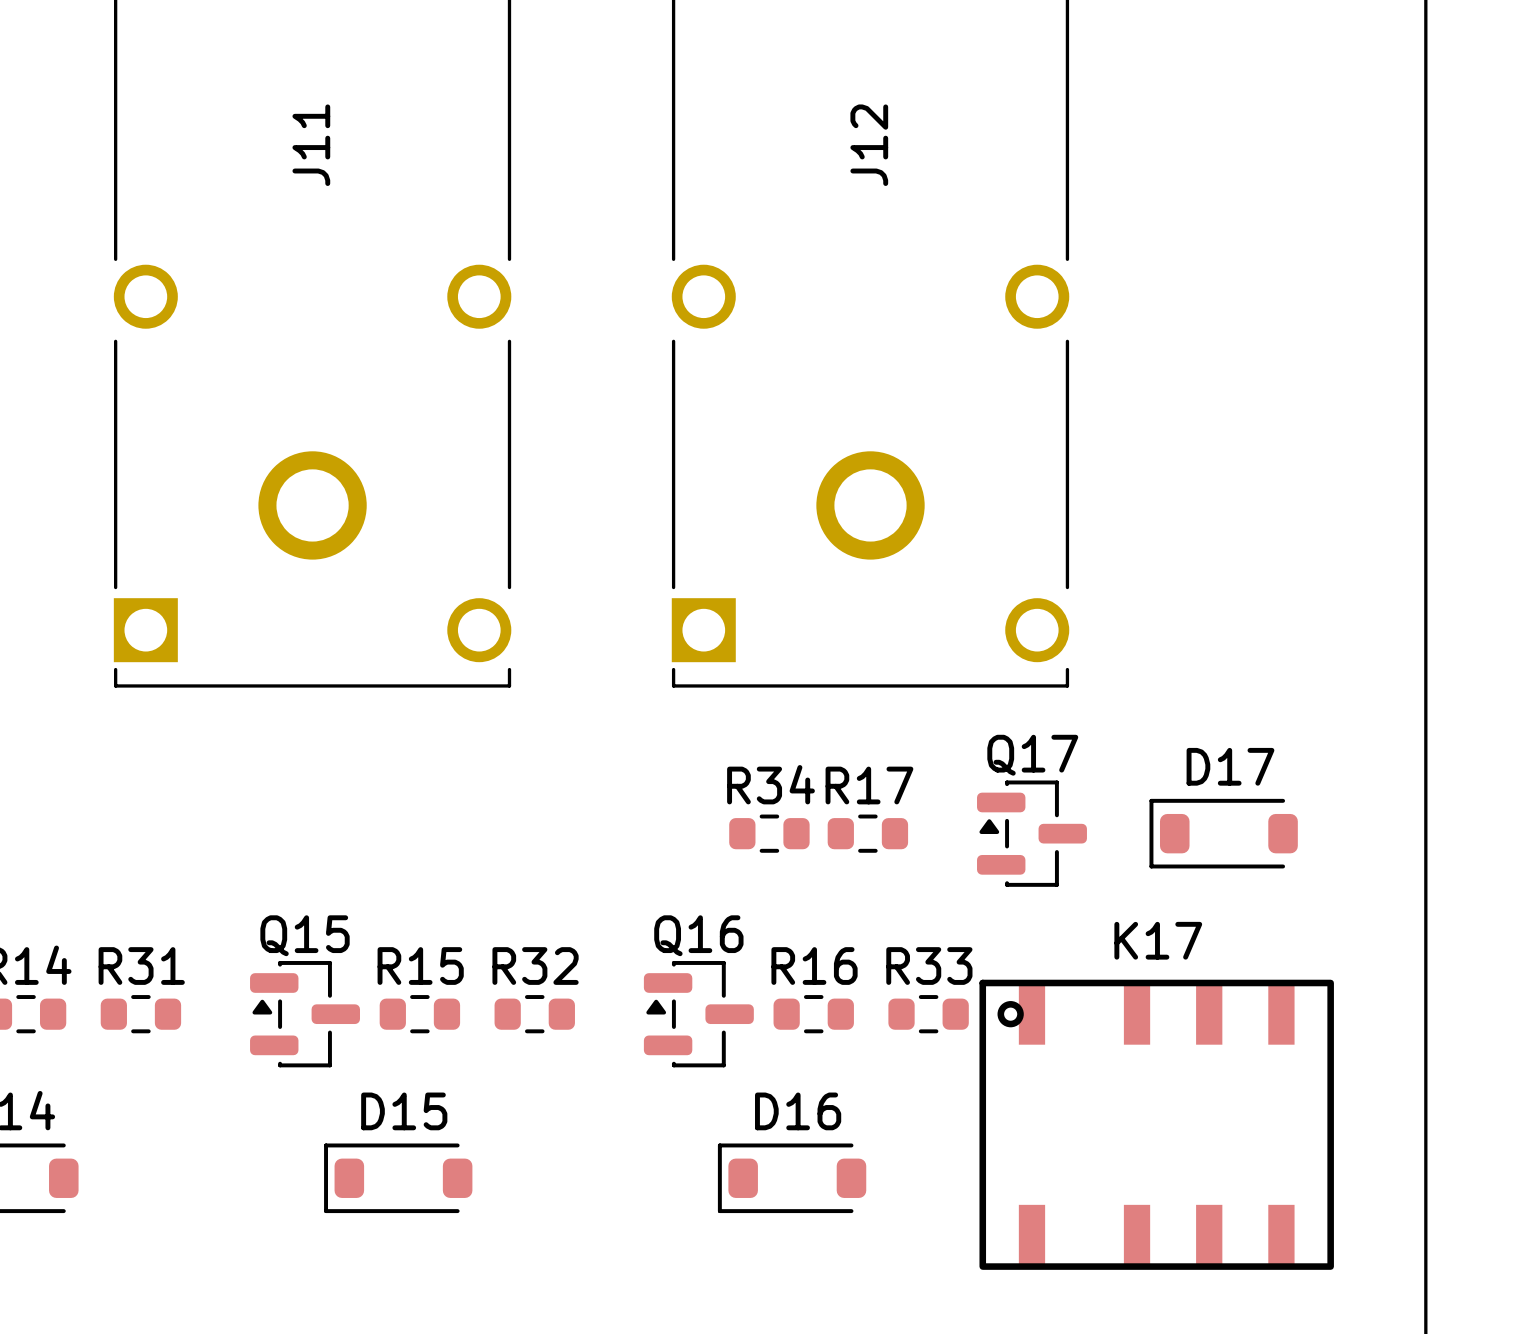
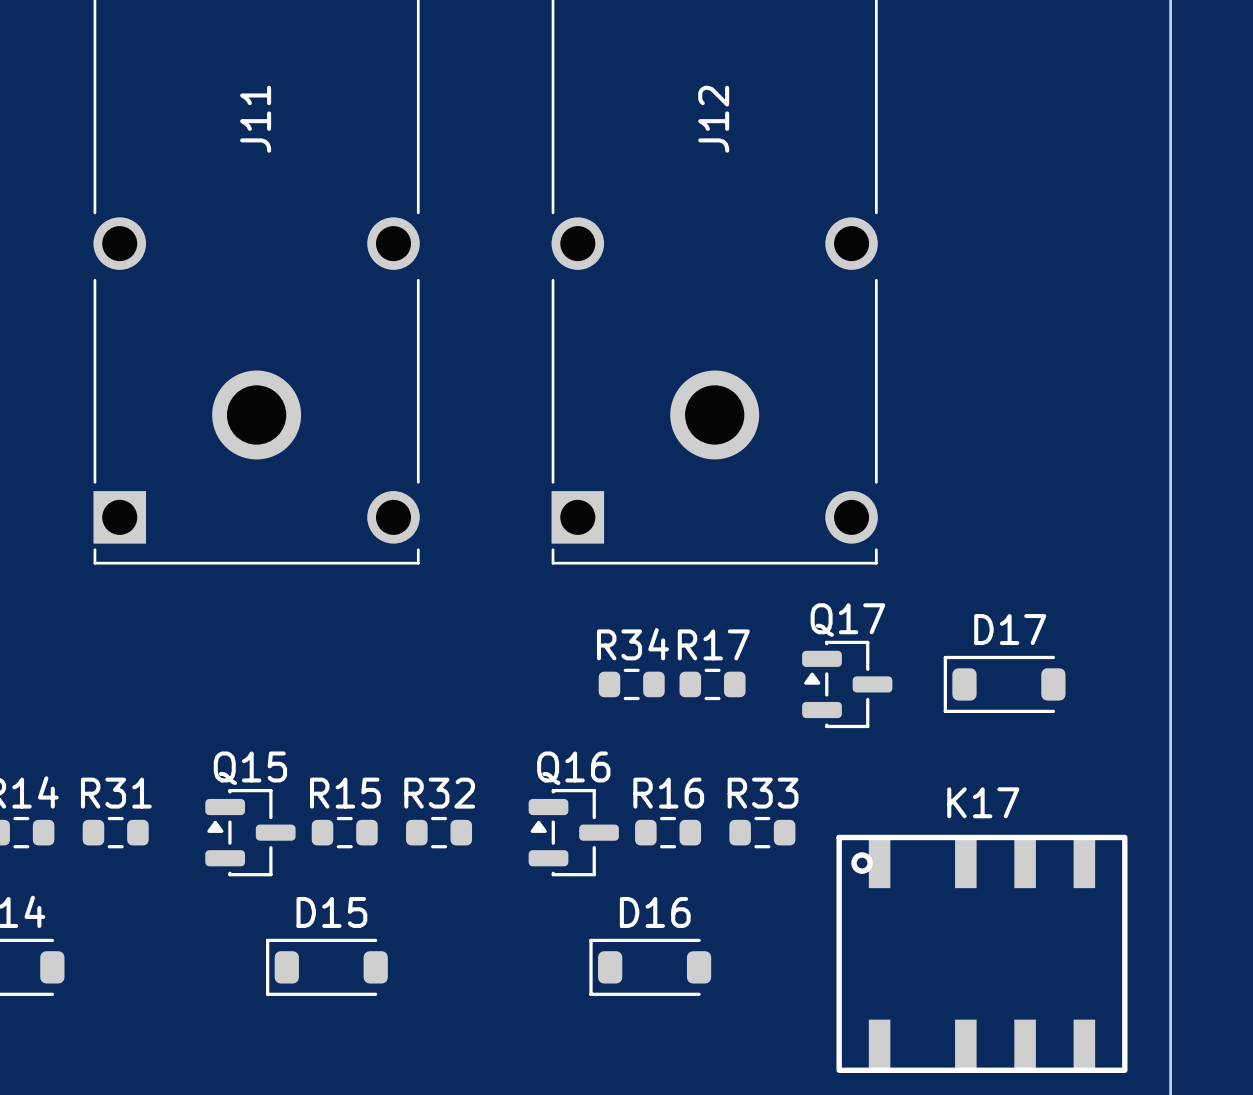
K17 position: (1156, 1124) -> (981, 953)

